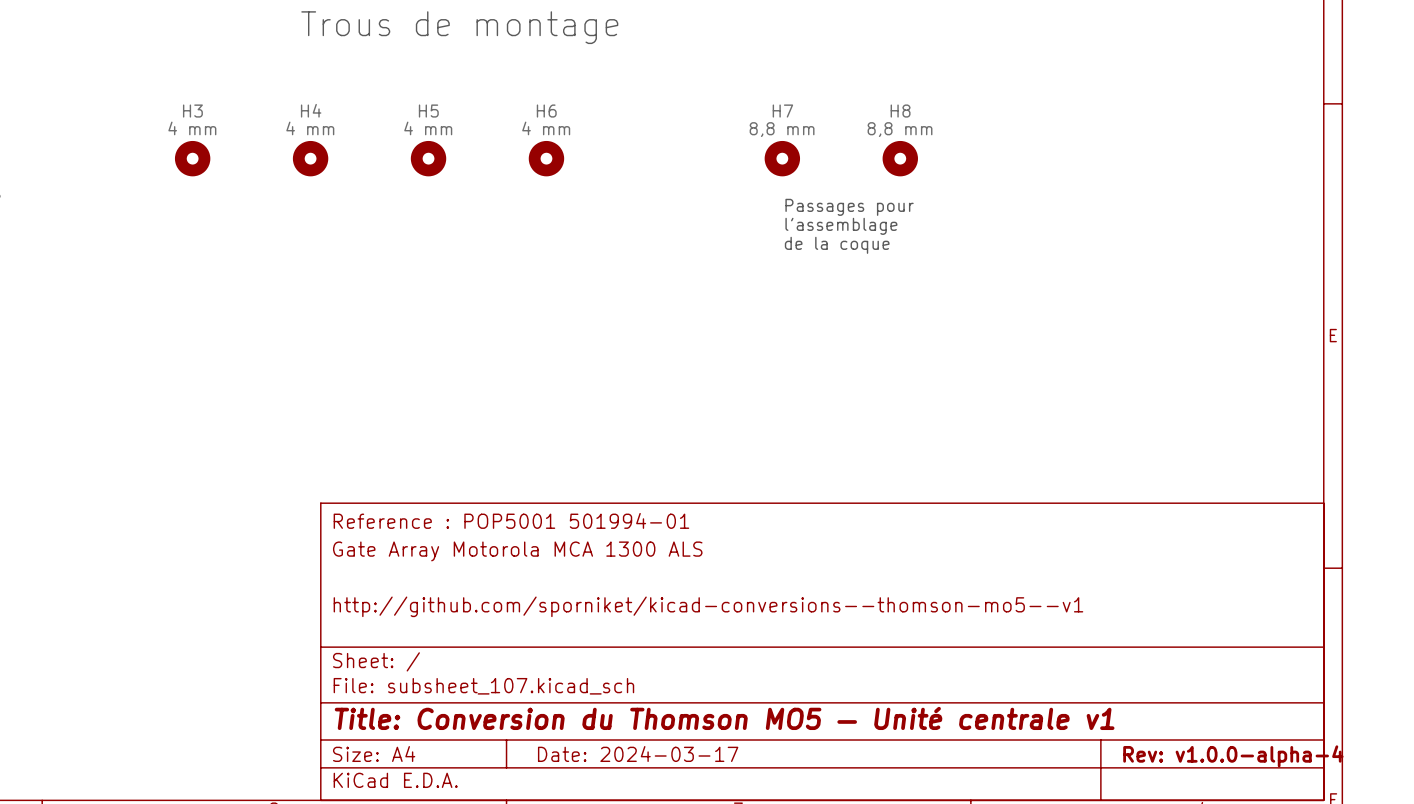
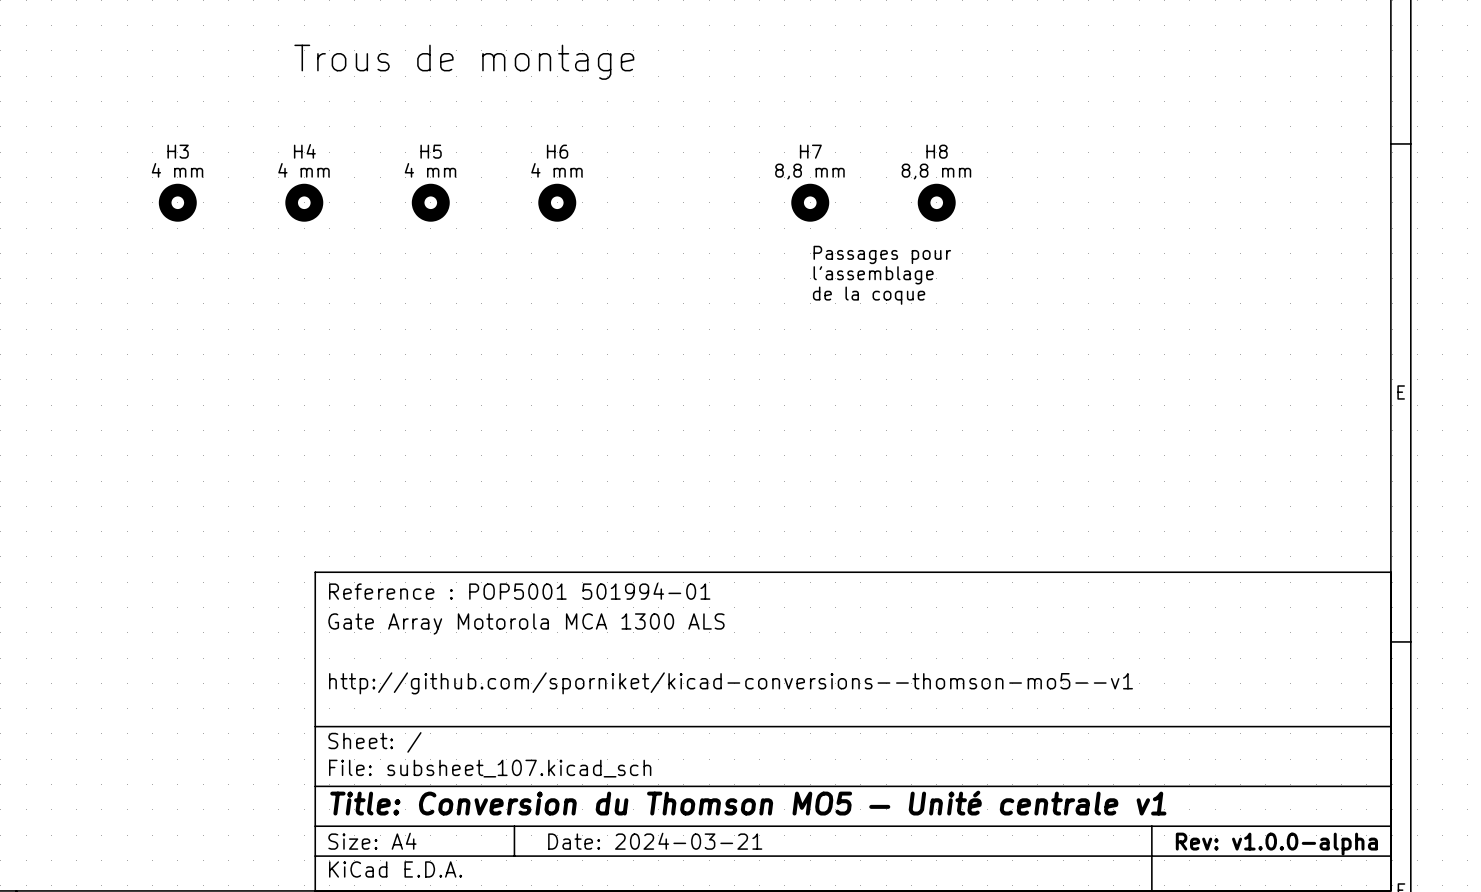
title block: Date: 2024-03-17 (638, 754) -> Date: 2024-03-21 (655, 841)
title block: Rev: v1.0.0-alpha-4 (1233, 756) -> Rev: v1.0.0-alpha (1276, 844)

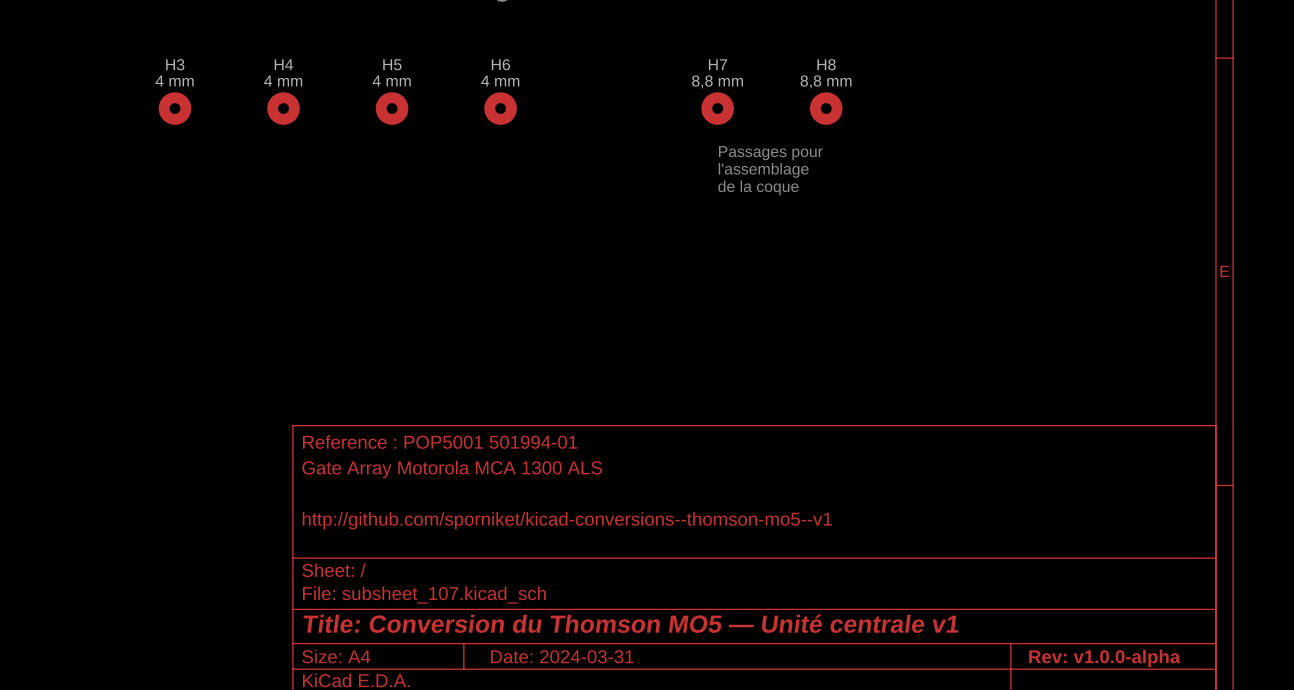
title block: Date: 2024-03-21 (655, 841) -> Date: 2024-03-31 (562, 656)

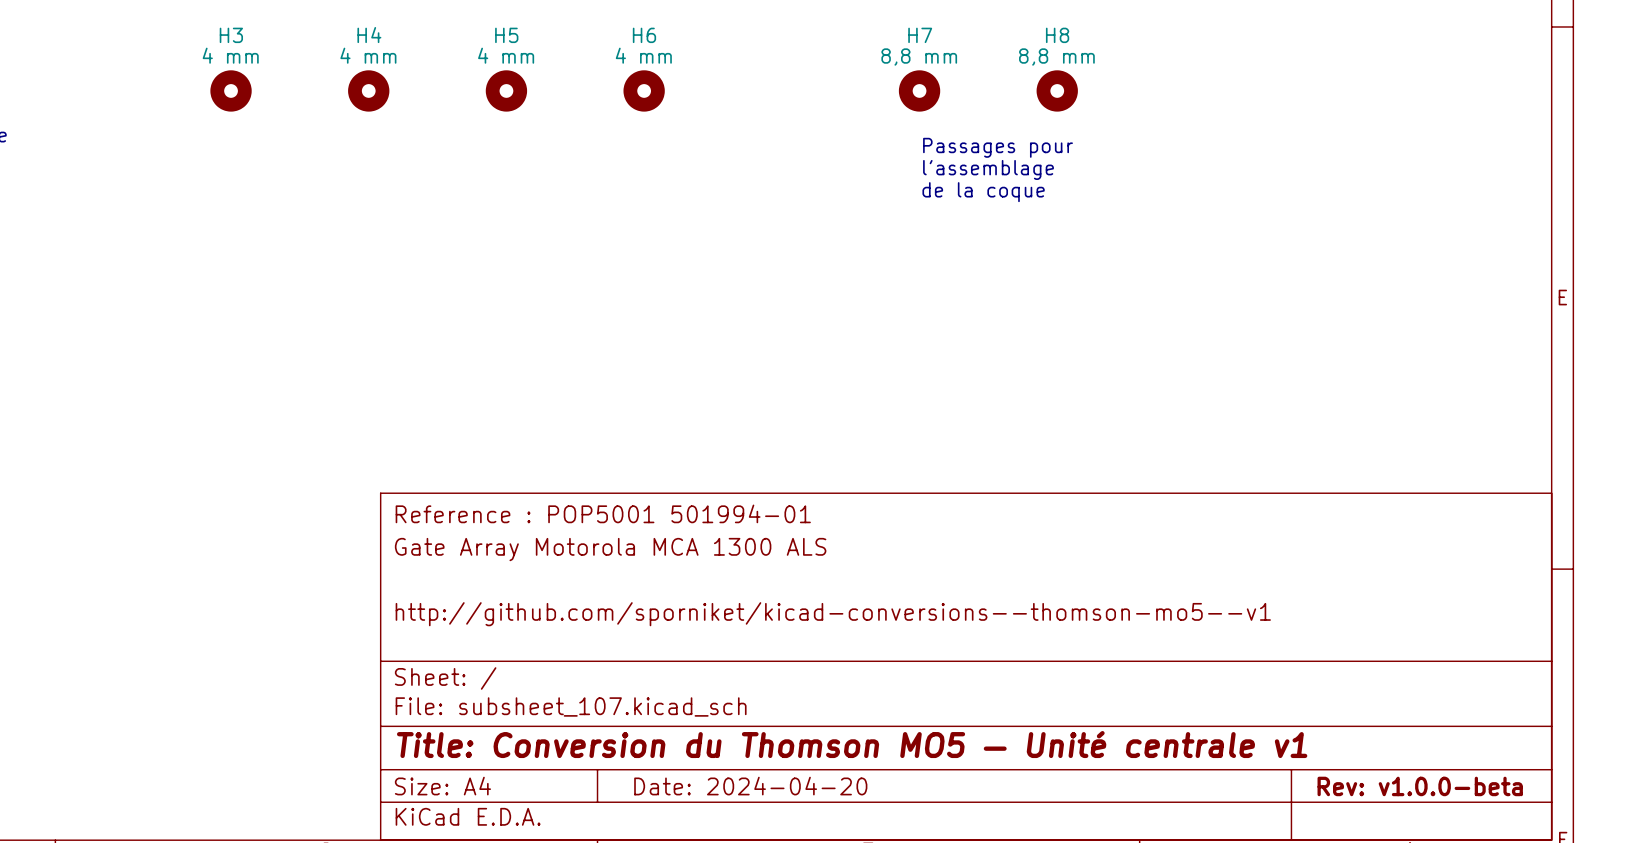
title block: Date: 2024-03-31 (562, 656) -> Date: 2024-04-20 (750, 786)
title block: Rev: v1.0.0-alpha (1104, 658) -> Rev: v1.0.0-beta (1420, 786)

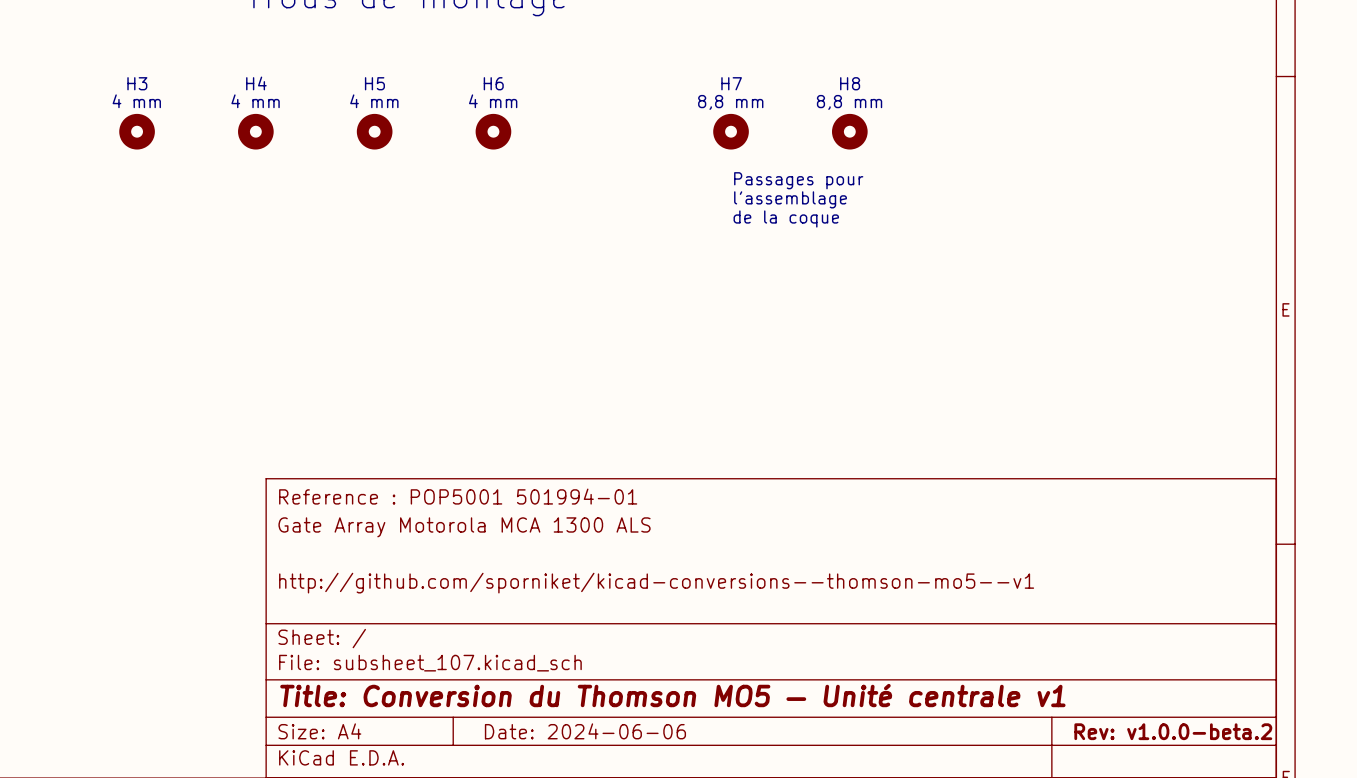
title block: Date: 2024-04-20 (750, 786) -> Date: 2024-06-06 (585, 731)
title block: Rev: v1.0.0-beta (1420, 786) -> Rev: v1.0.0-beta.2 (1173, 731)

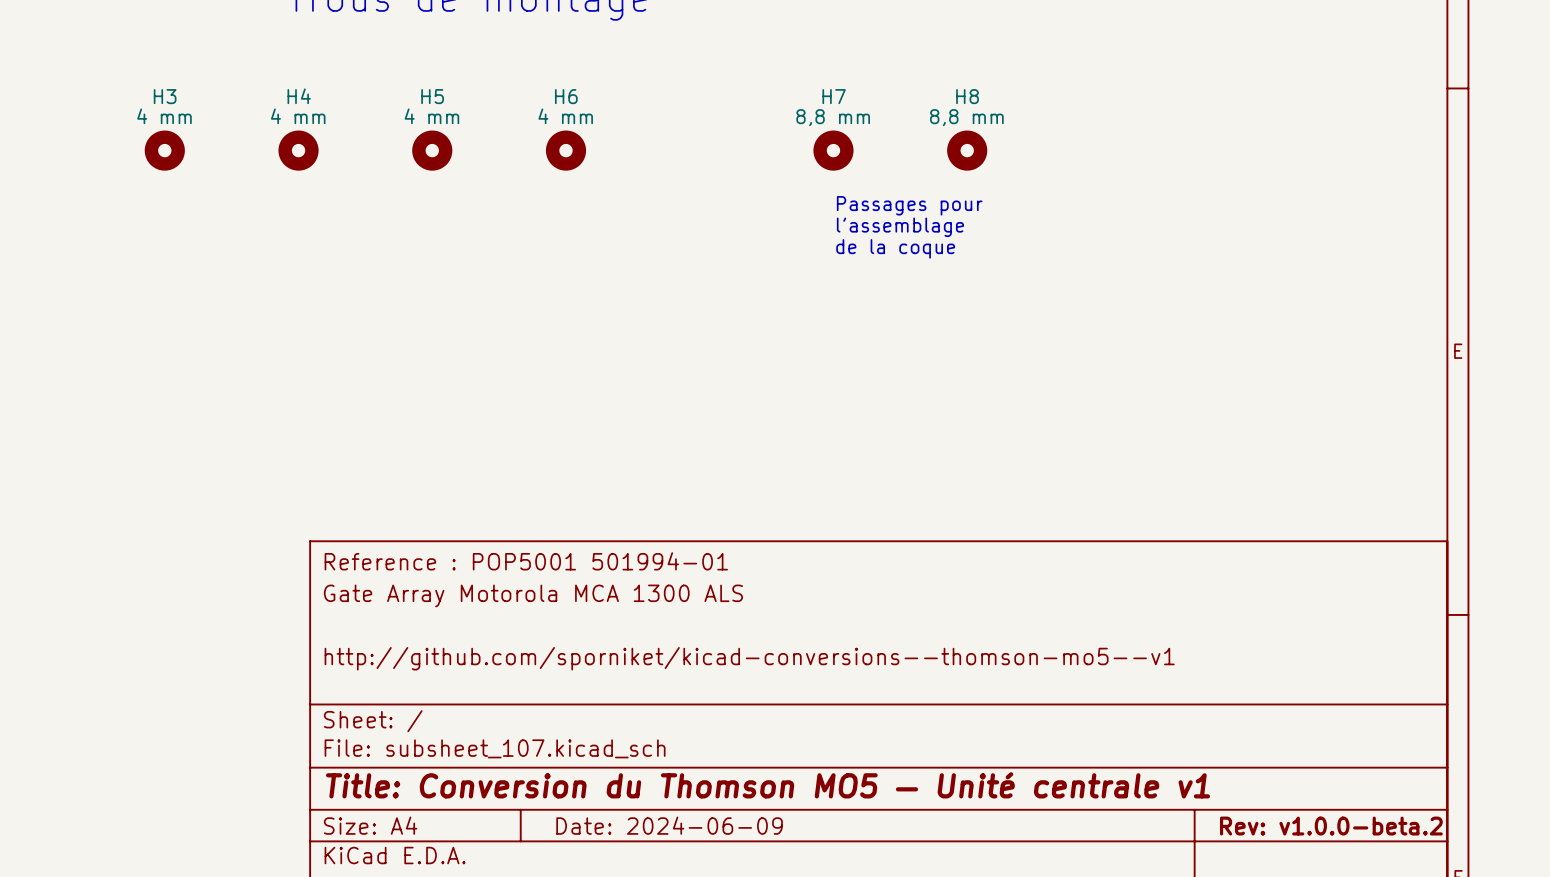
title block: Date: 2024-06-06 (585, 731) -> Date: 2024-06-09 (669, 825)

